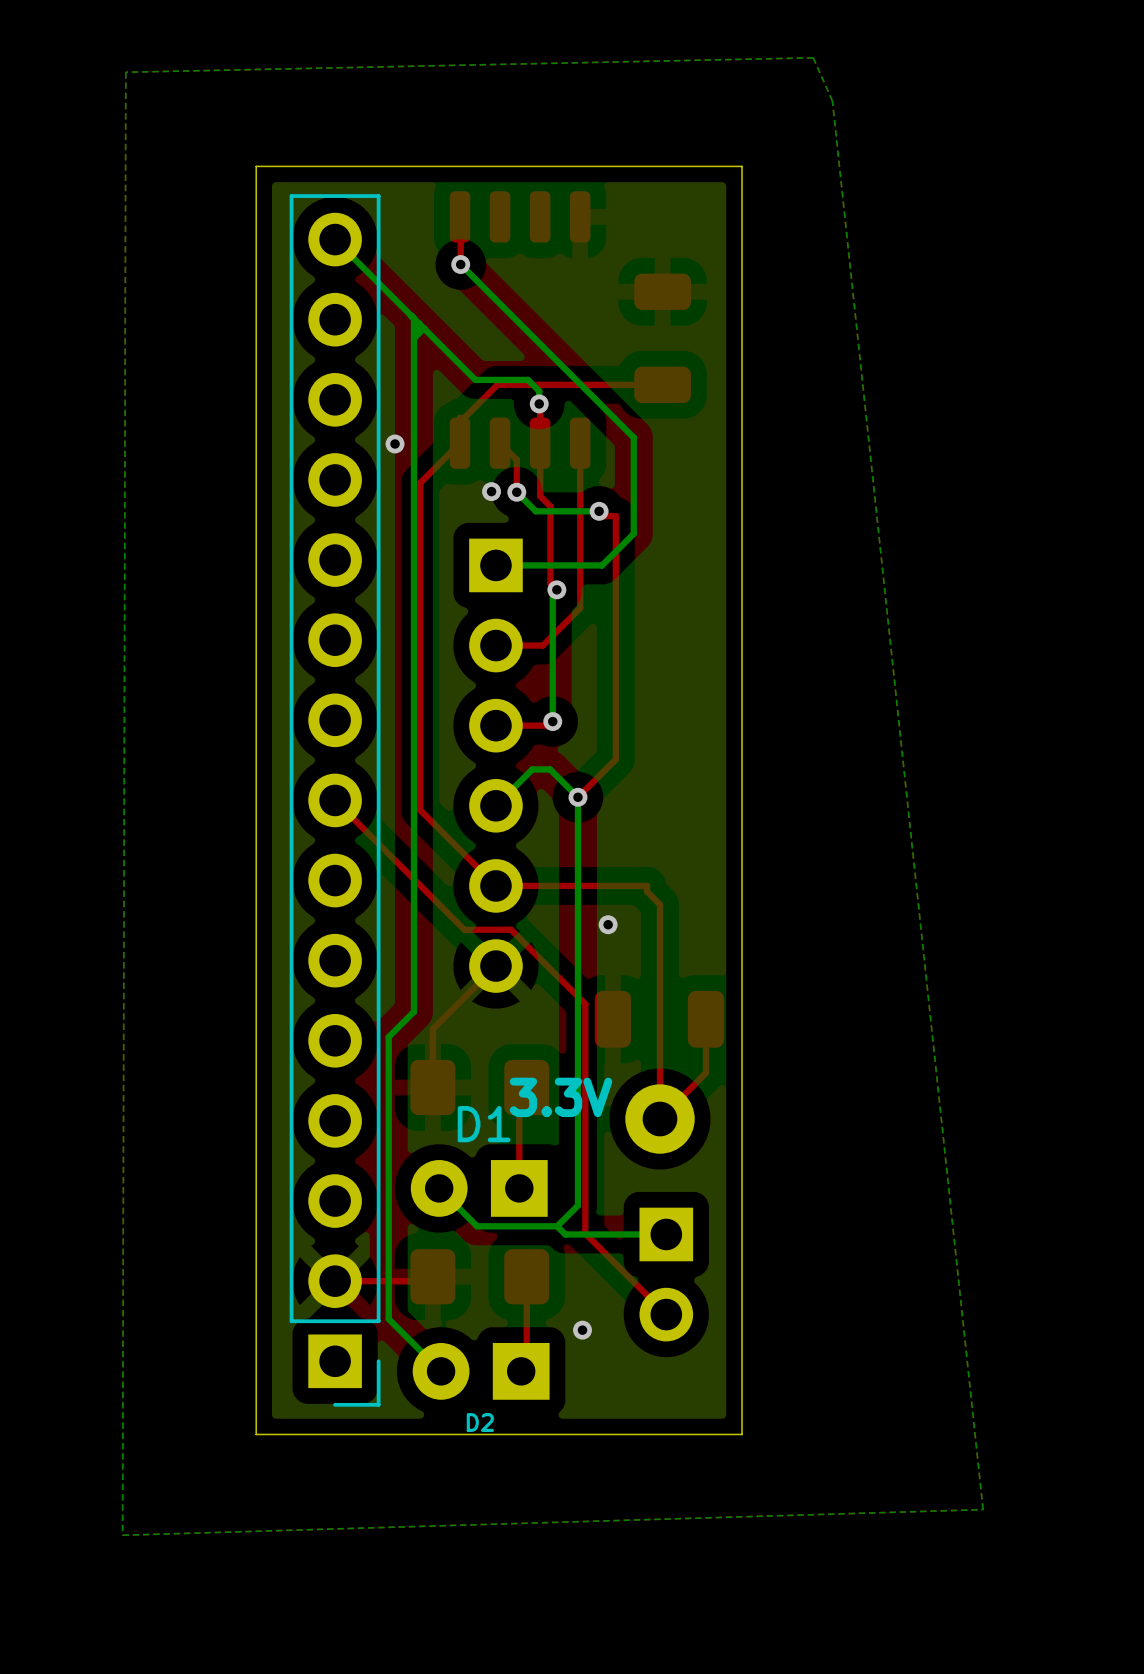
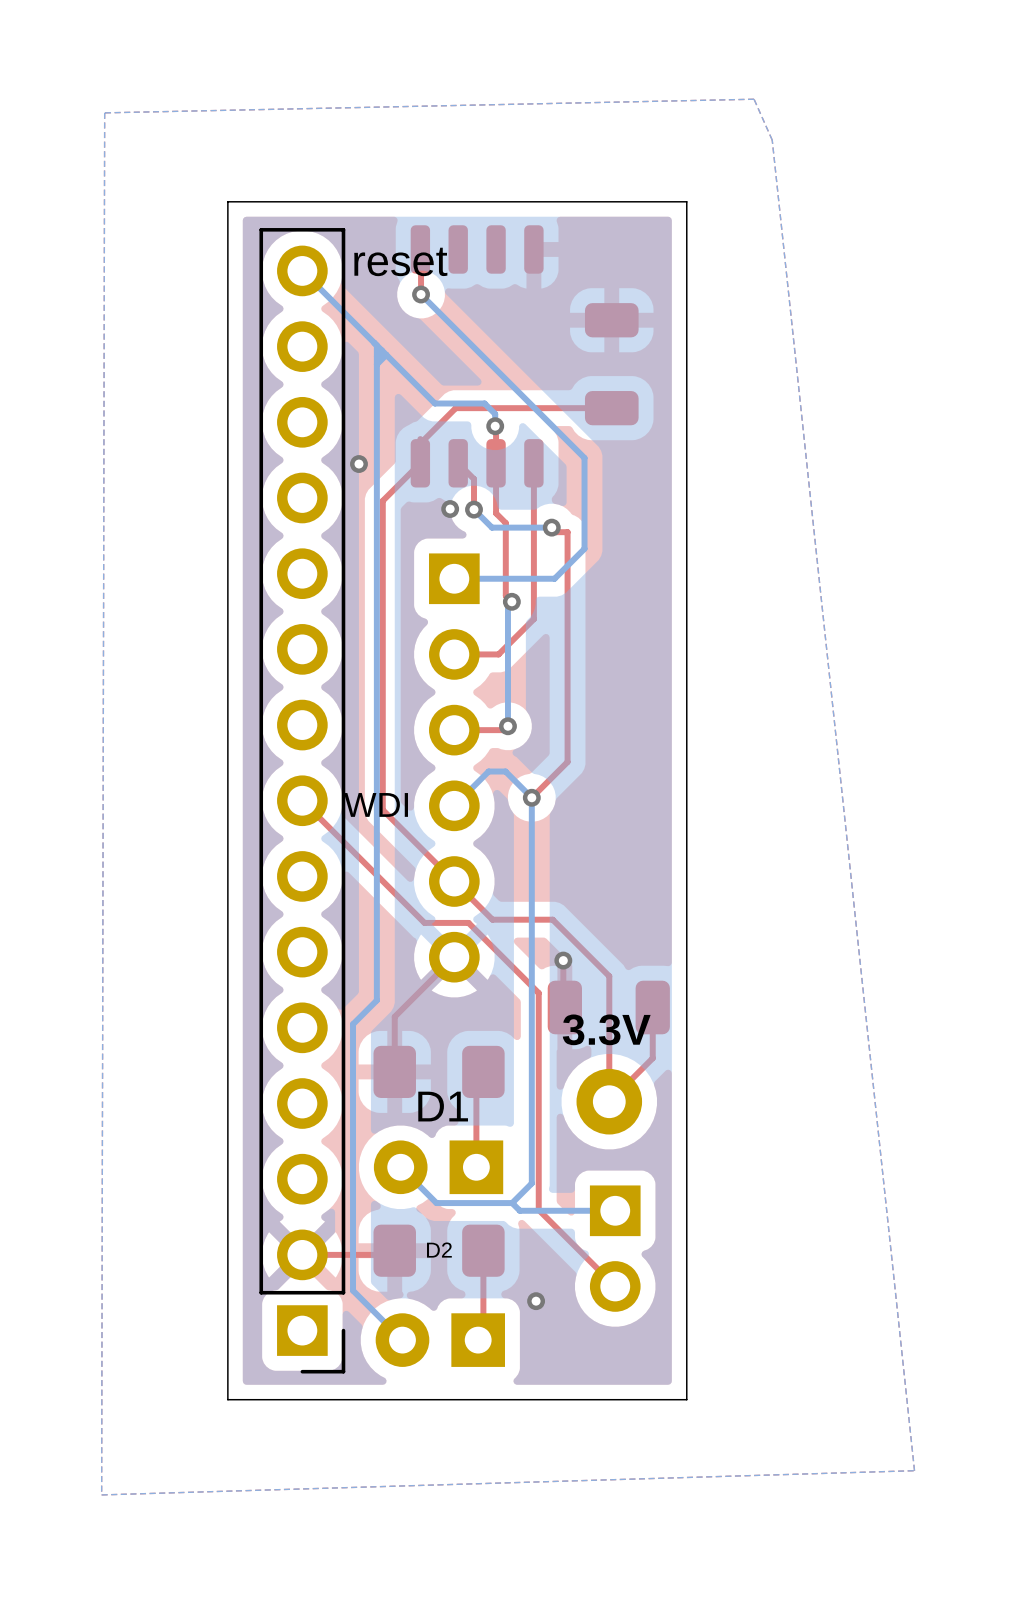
text: none -> reset (400, 261)
text: none -> WDI (375, 804)
top track: (495, 885) (647, 885) (647, 891) (660, 904) (660, 986) -> (454, 881) (492, 919) (552, 919) (609, 976)
via position: (608, 924) -> (563, 960)
text position: 3.3V (560, 1097) -> 3.3V (606, 1029)
D2 name position: D2 (480, 1422) -> D2 (439, 1250)

